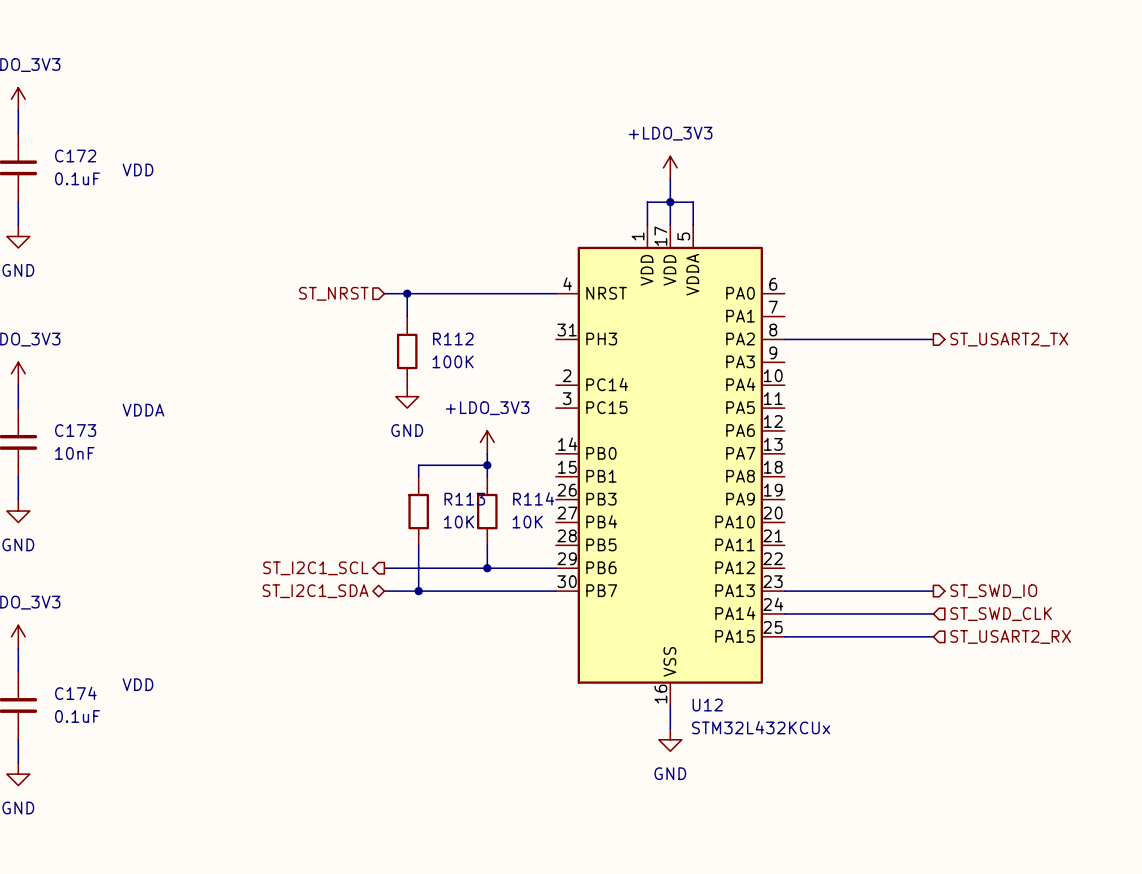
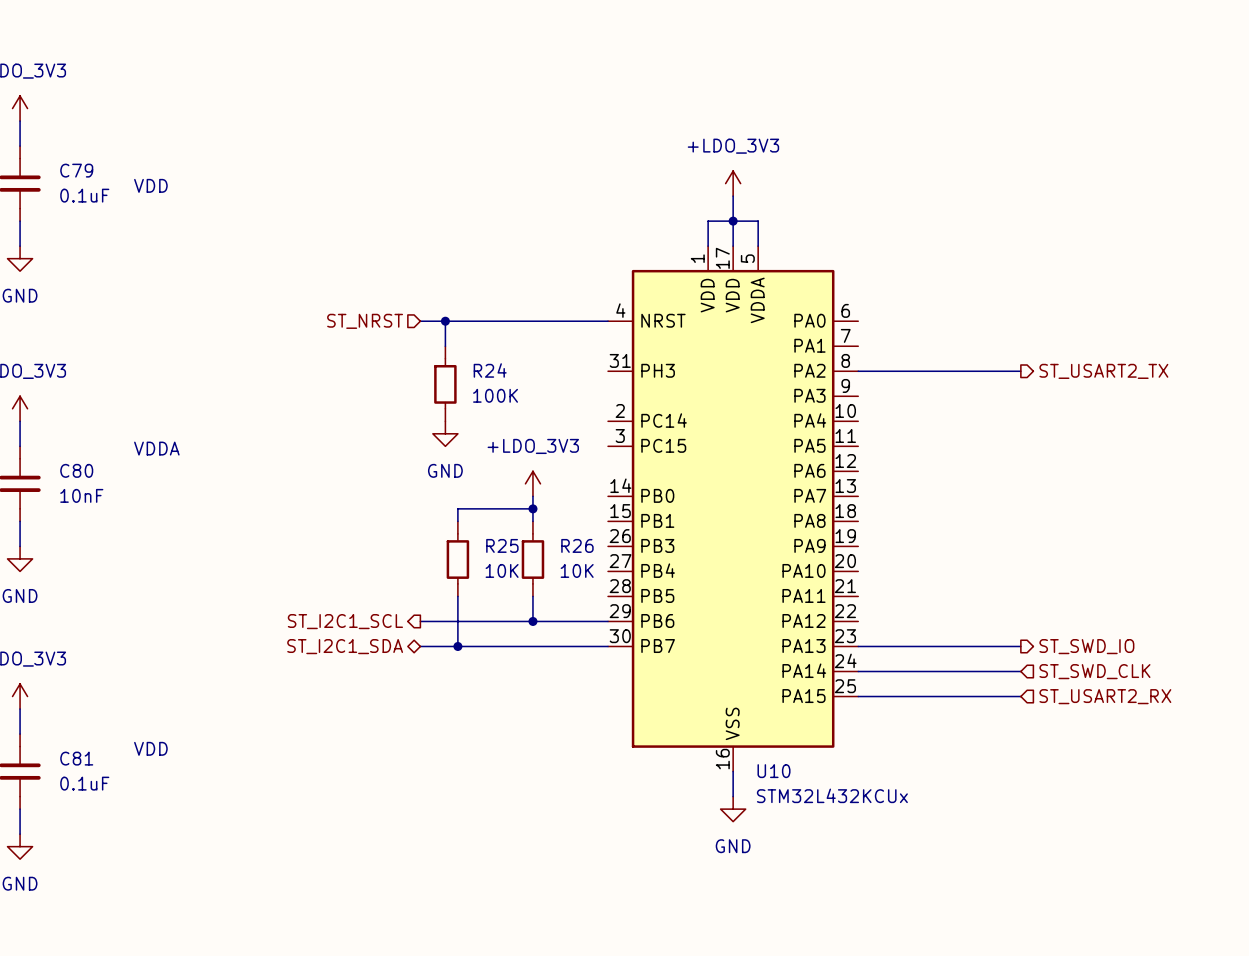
C172 name: C172 (75, 156) -> C79 (76, 170)
R112 name: R112 (453, 339) -> R24 (490, 370)
C173 name: C173 (75, 430) -> C80 (76, 470)
R114 name: R114 (533, 498) -> R26 (577, 545)
R113 name: R113 (464, 499) -> R25 (502, 545)
C174 name: C174 (75, 693) -> C81 (76, 758)
U12 name: U12 (707, 705) -> U10 (774, 771)

